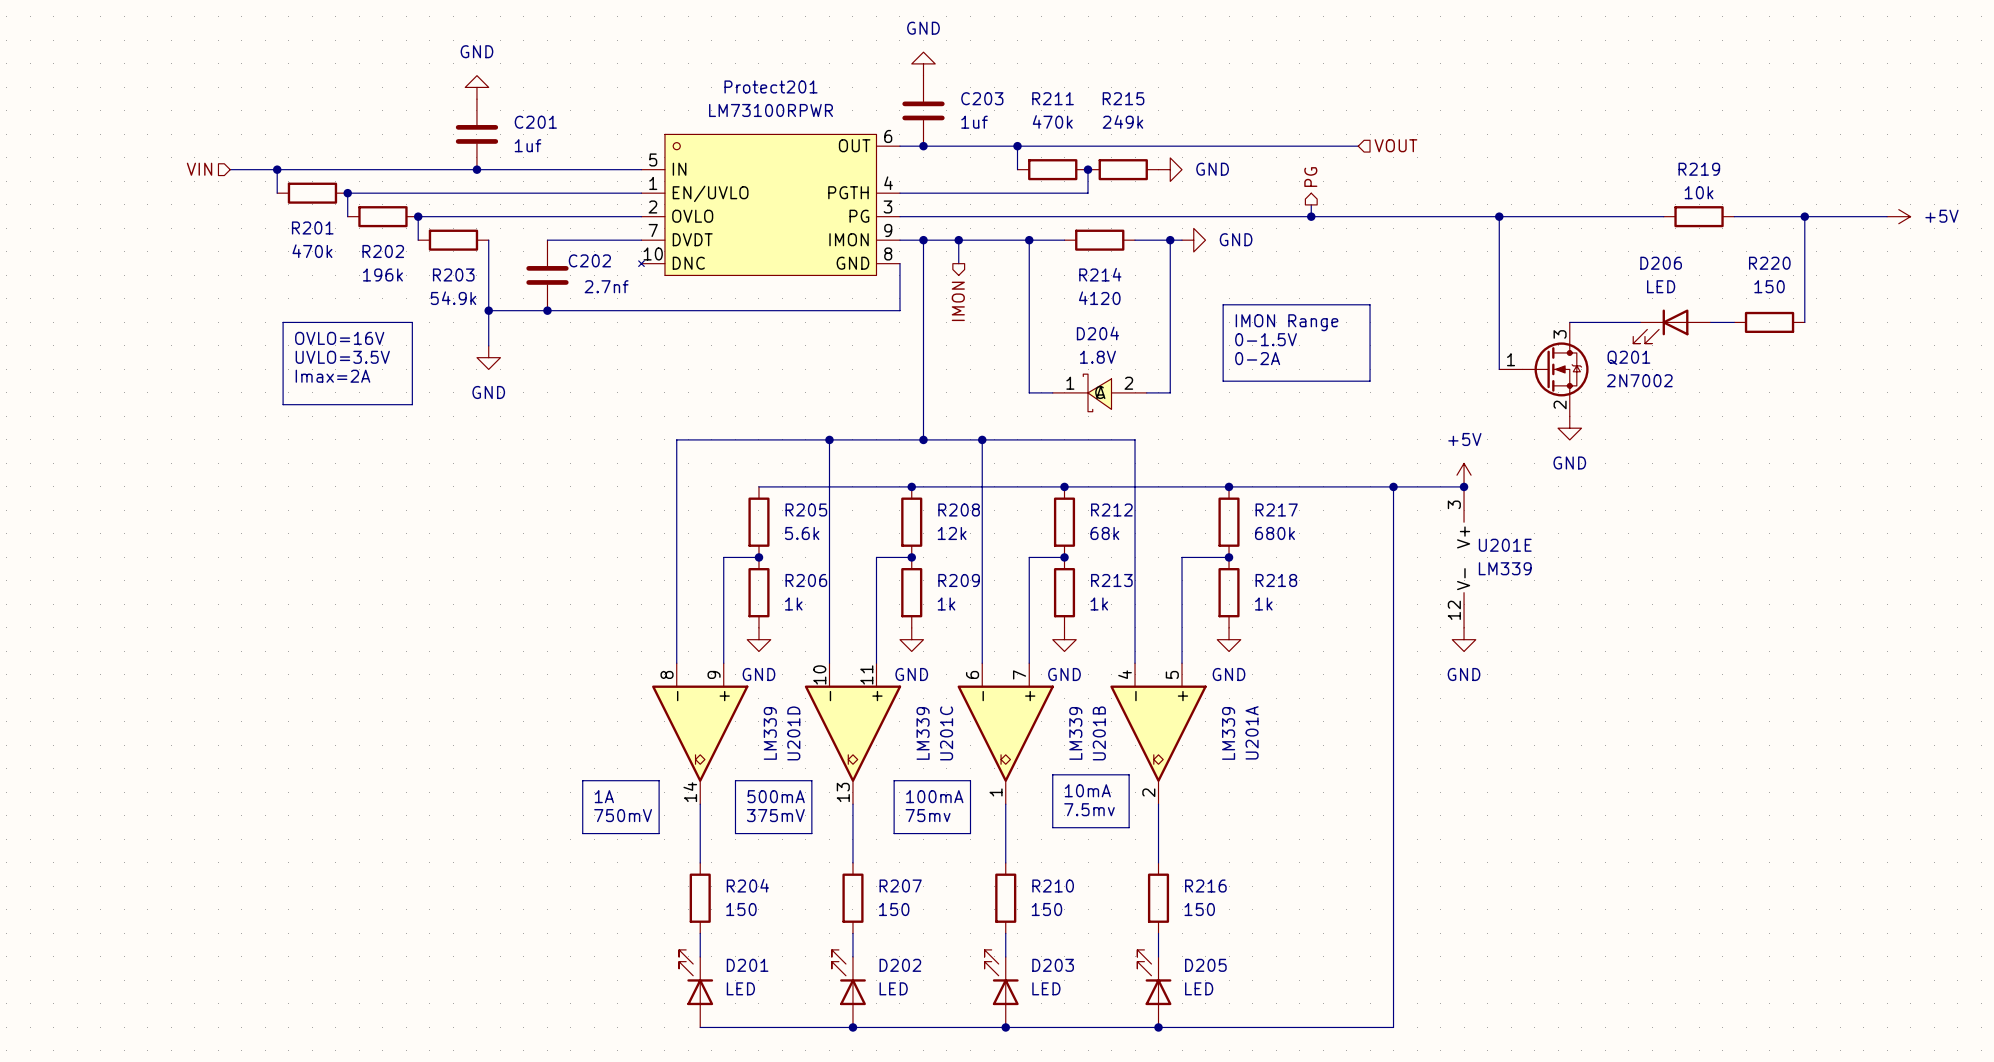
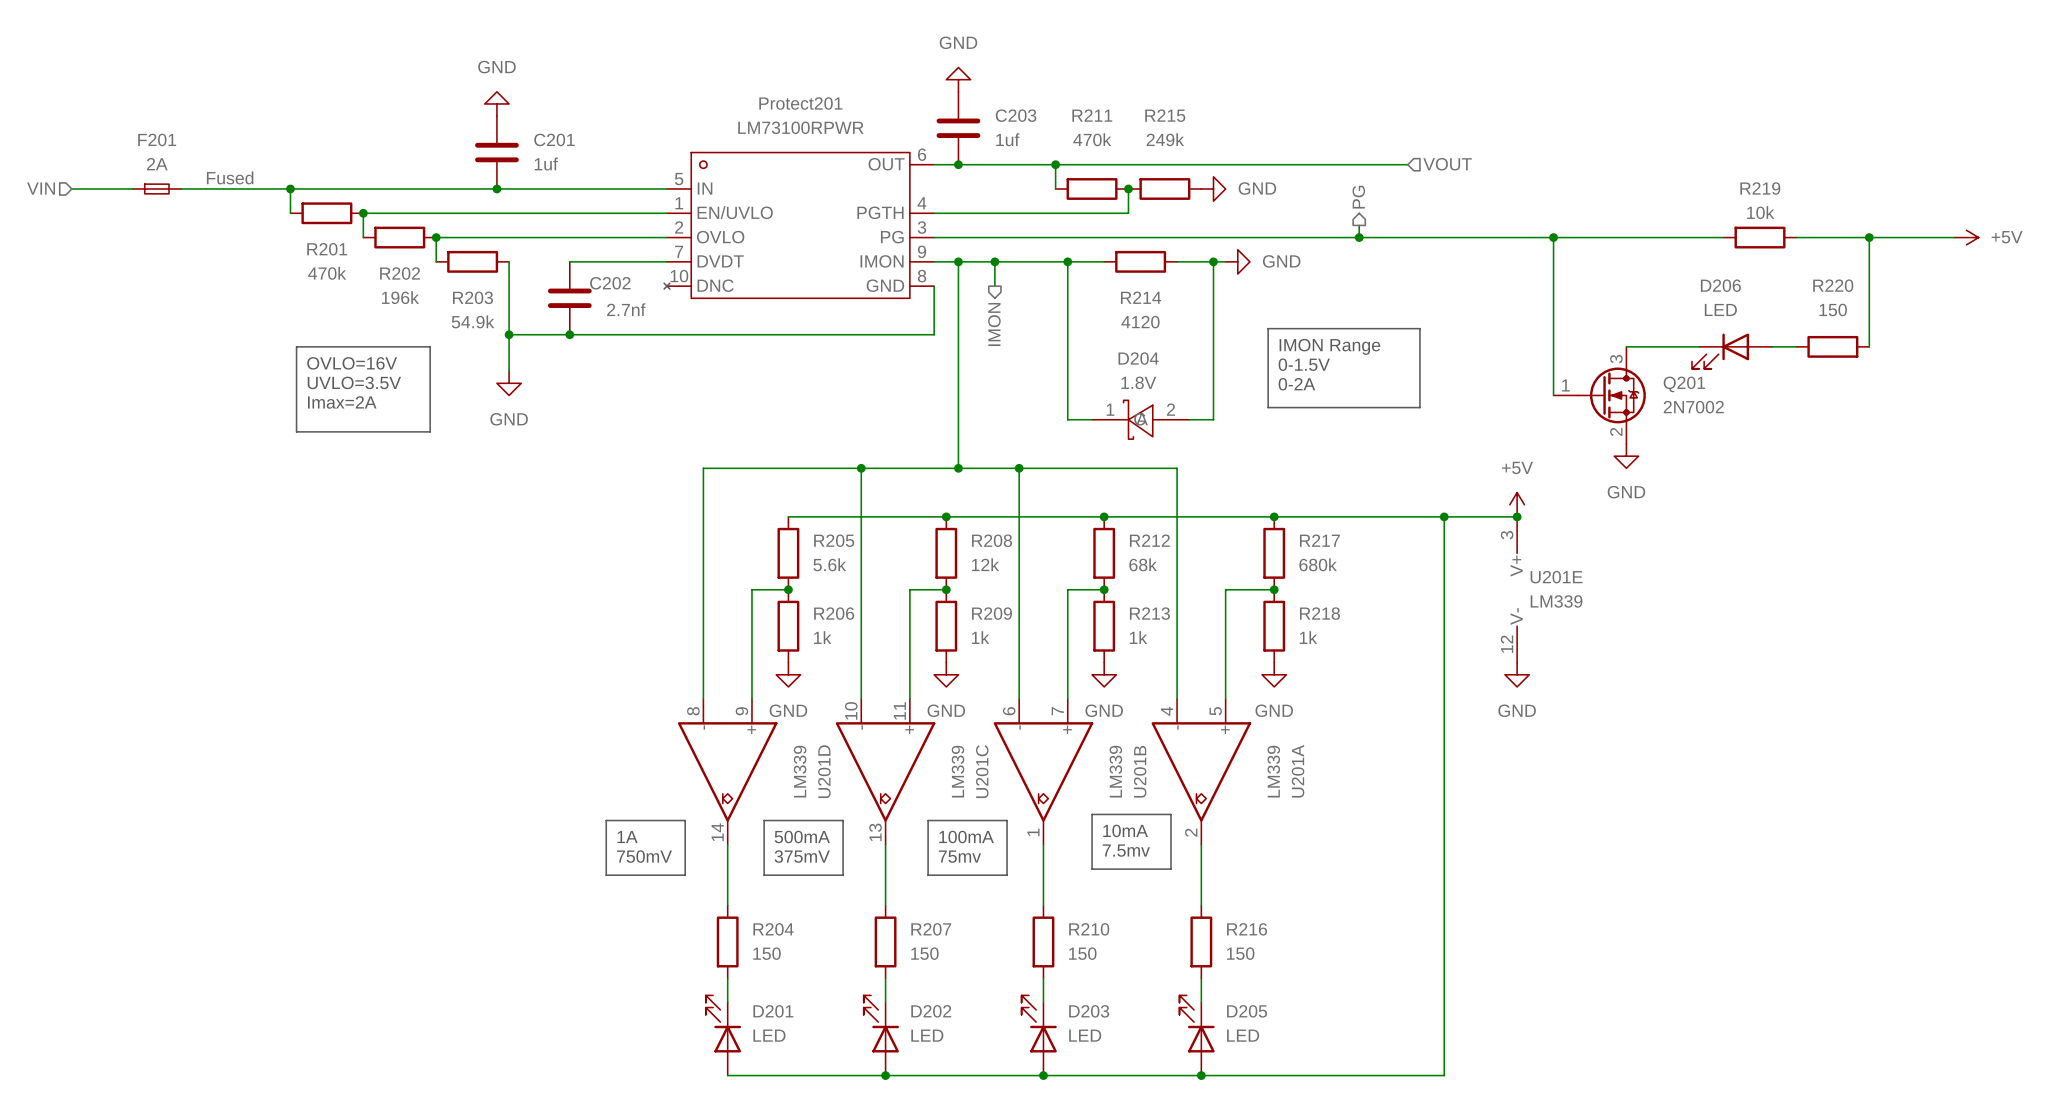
label: none -> Fused (230, 177)
wire: none -> (71, 188) (132, 188)
F201: none -> 2A (156, 188)
wire: none -> (181, 188) (241, 188)
hierarchical label position: VIN (199, 169) -> VIN (41, 188)

